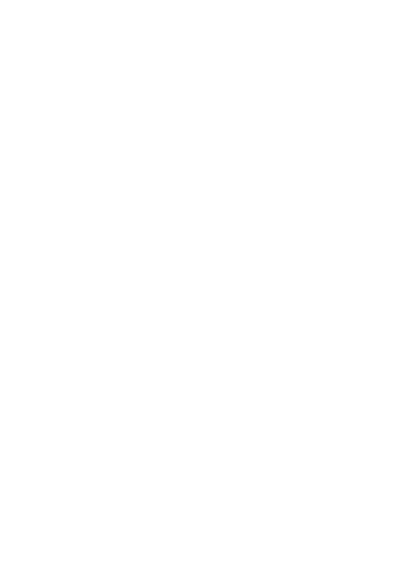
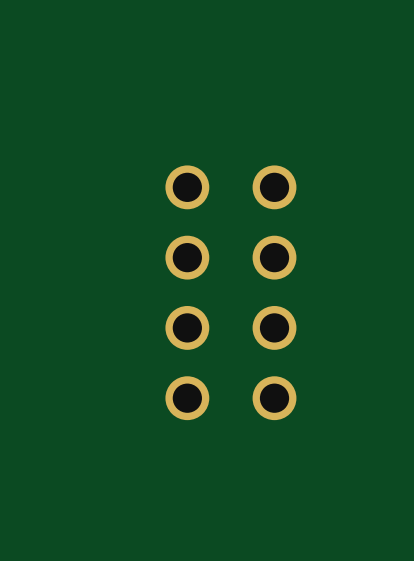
part: none -> (230, 292)

